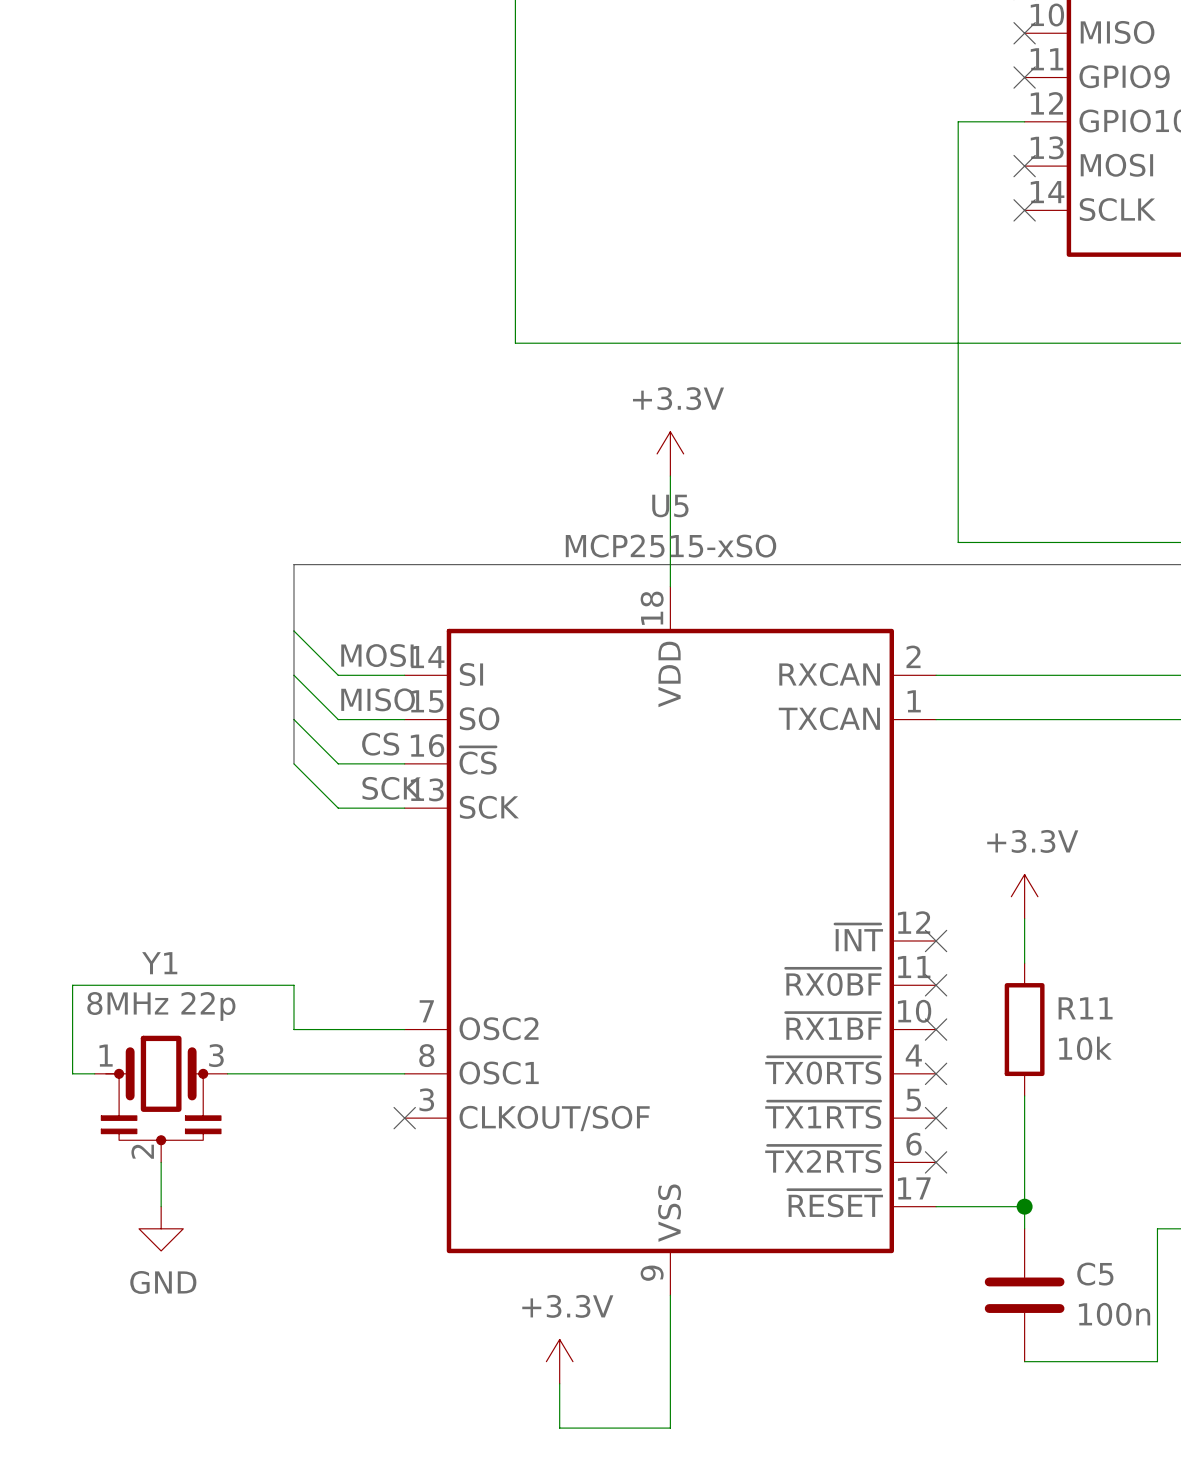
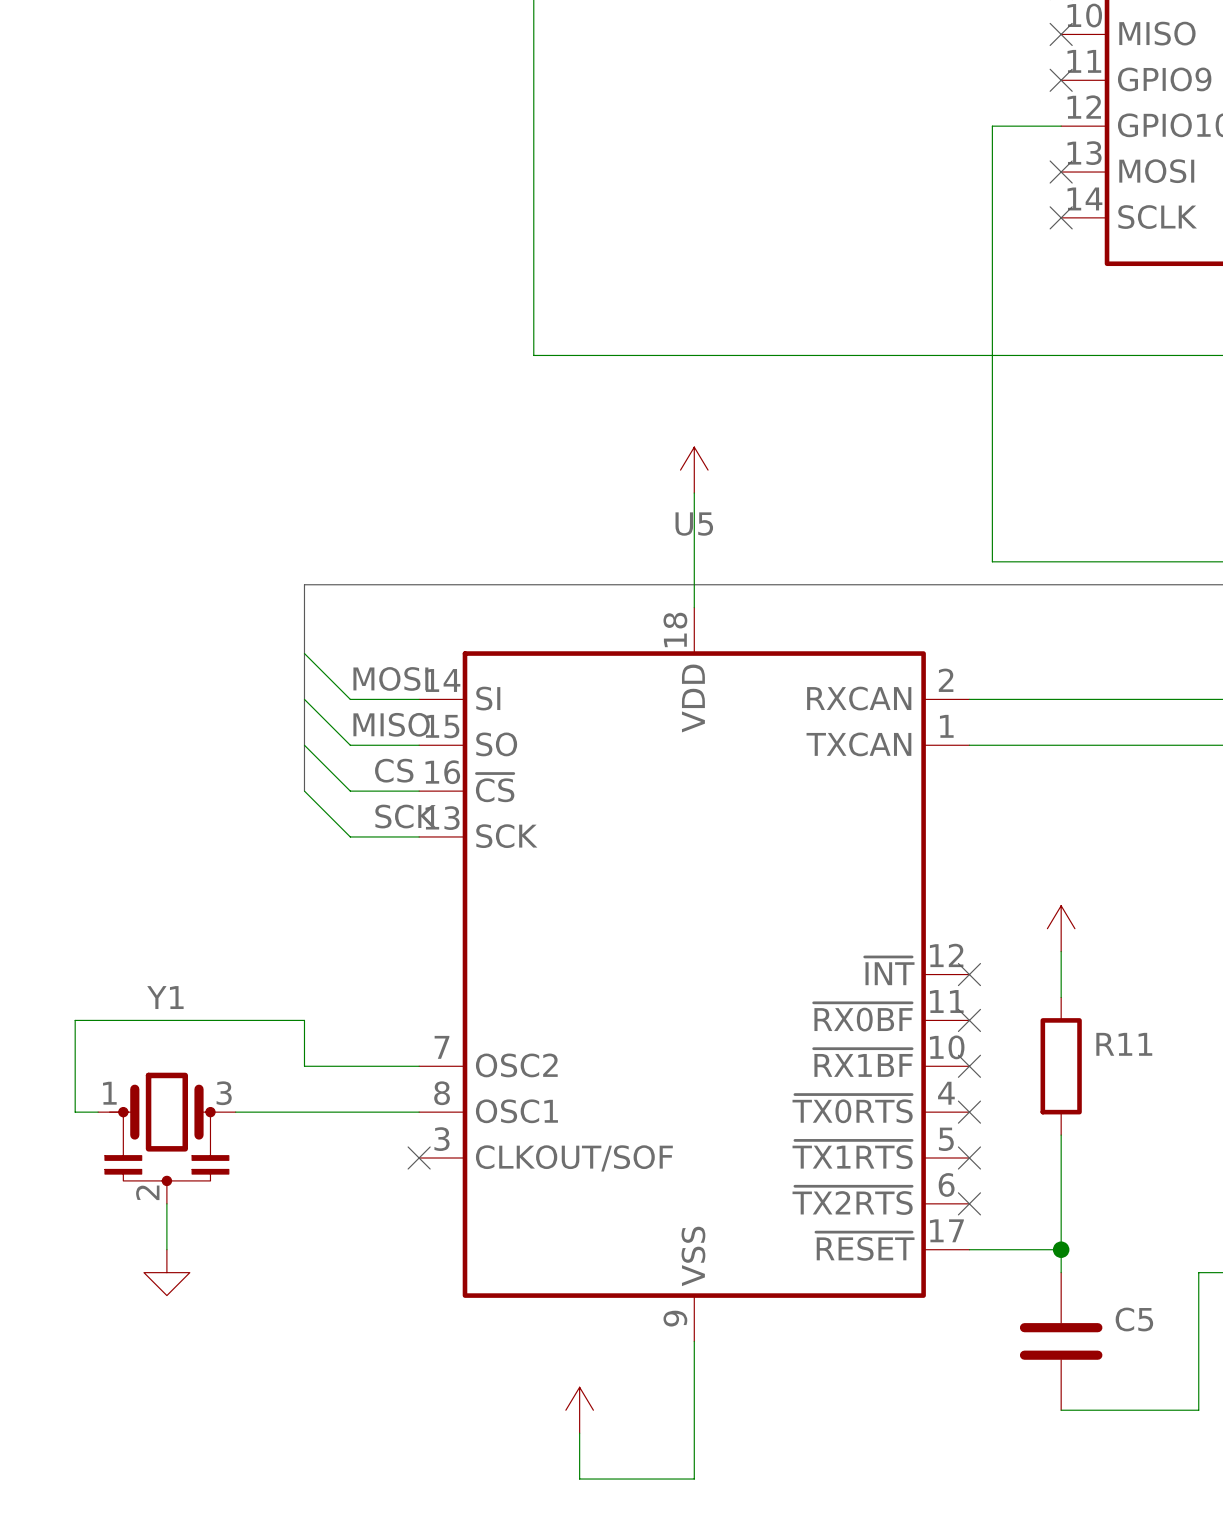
power symbol text: +3.3V (678, 398) -> none
U5 value: MCP2515-xSO (671, 546) -> none
power symbol text: +3.3V (1032, 841) -> none
Y1 value: 8MHz 22p (161, 1006) -> none
R11 value: 10k (1085, 1048) -> none
power symbol text: GND (163, 1282) -> none
power symbol text: +3.3V (567, 1306) -> none
C5 value: 100n (1114, 1314) -> none

